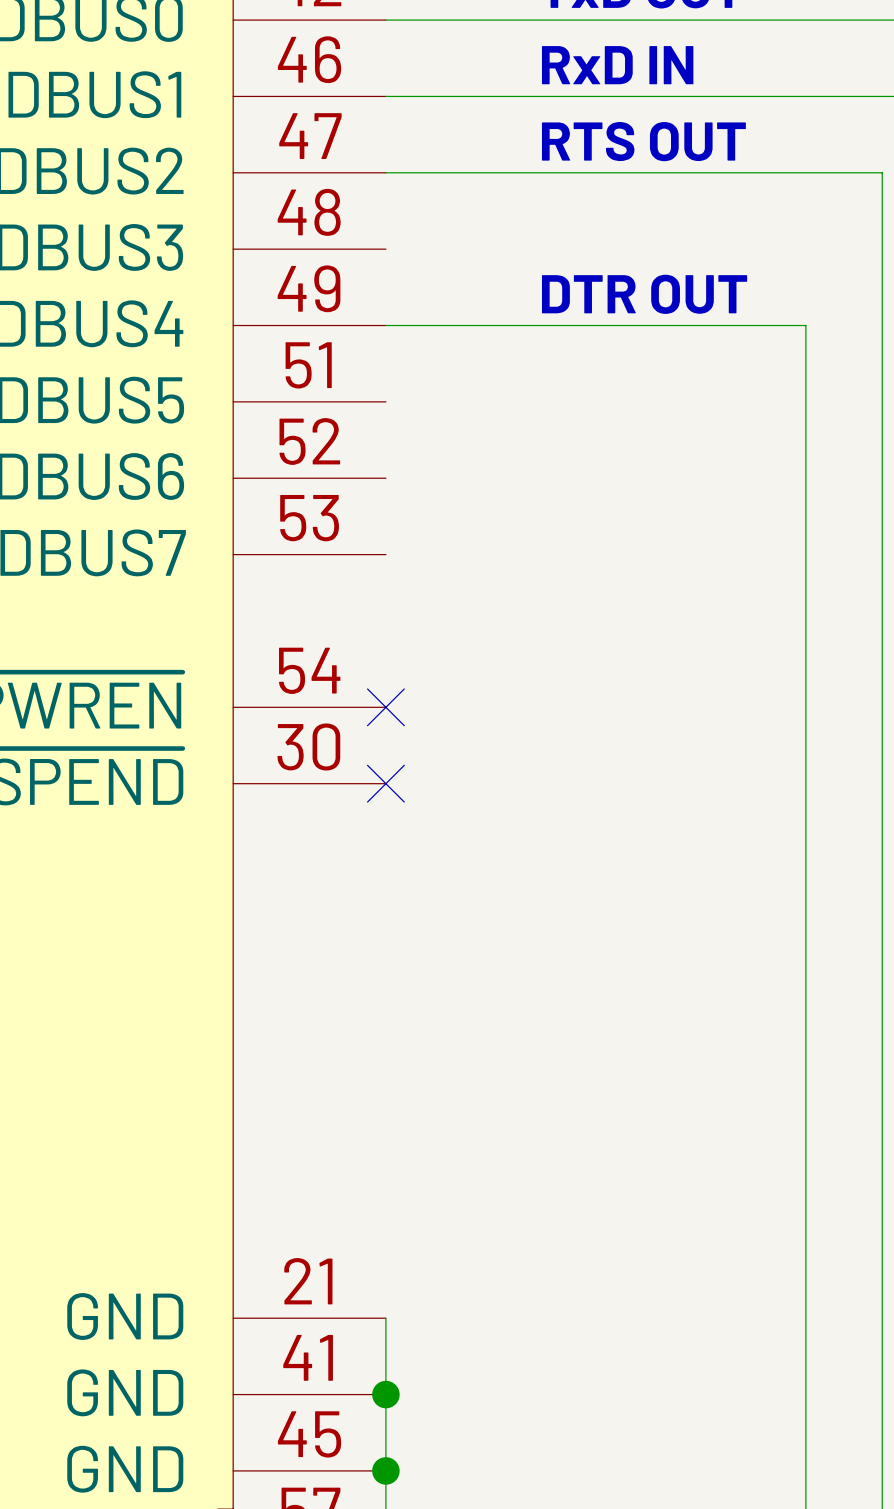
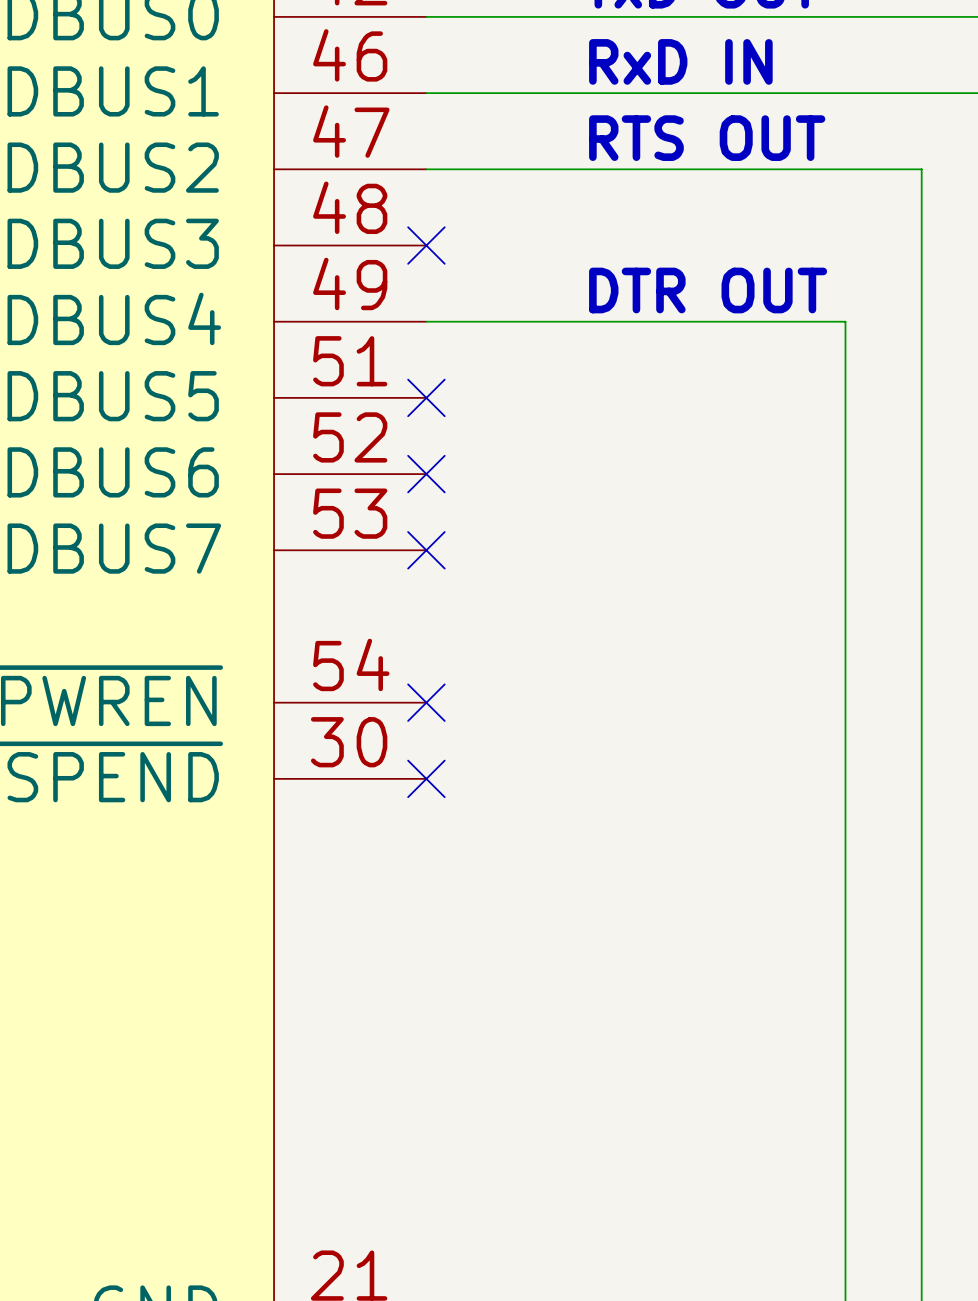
no-connect mark: none -> (426, 245)
no-connect mark: none -> (426, 397)
no-connect mark: none -> (426, 474)
no-connect mark: none -> (426, 550)

